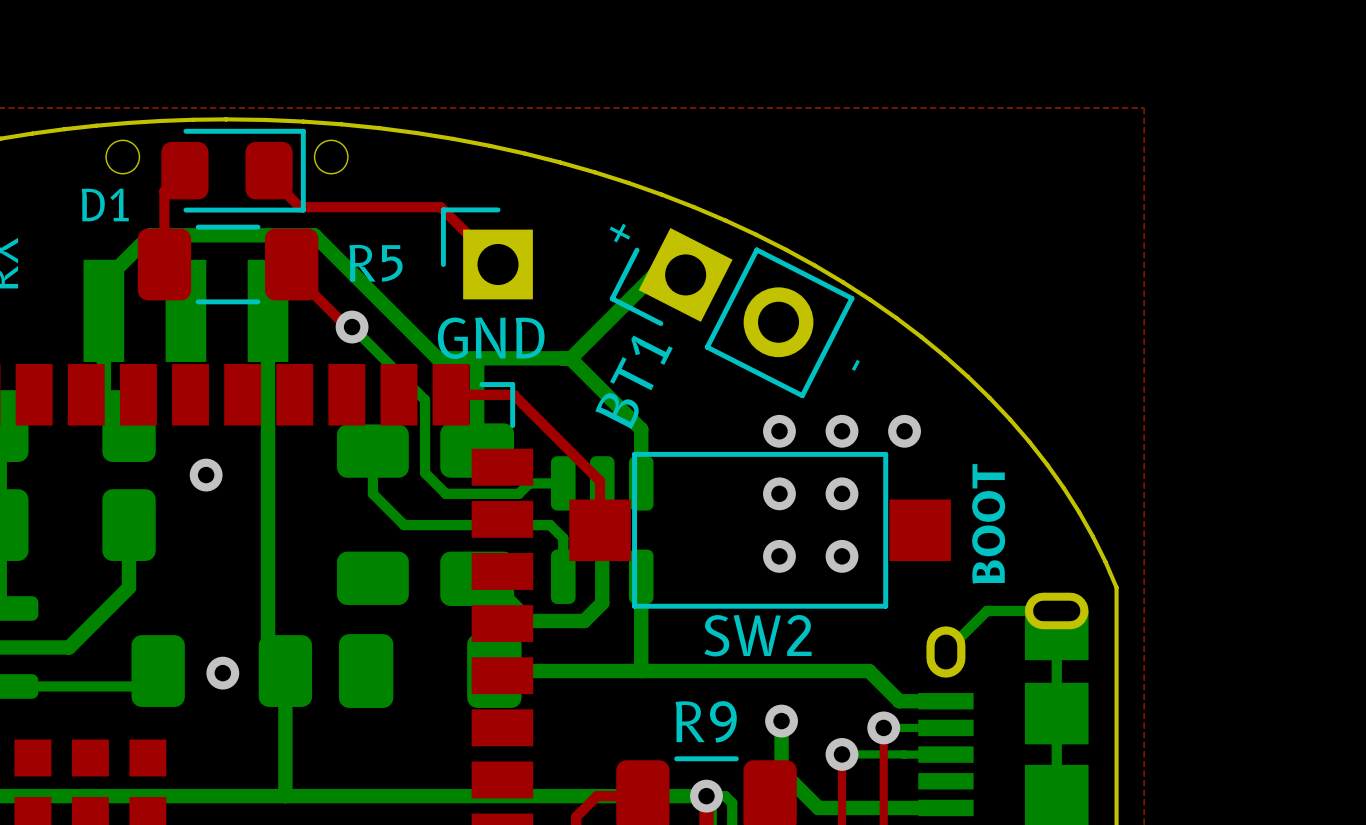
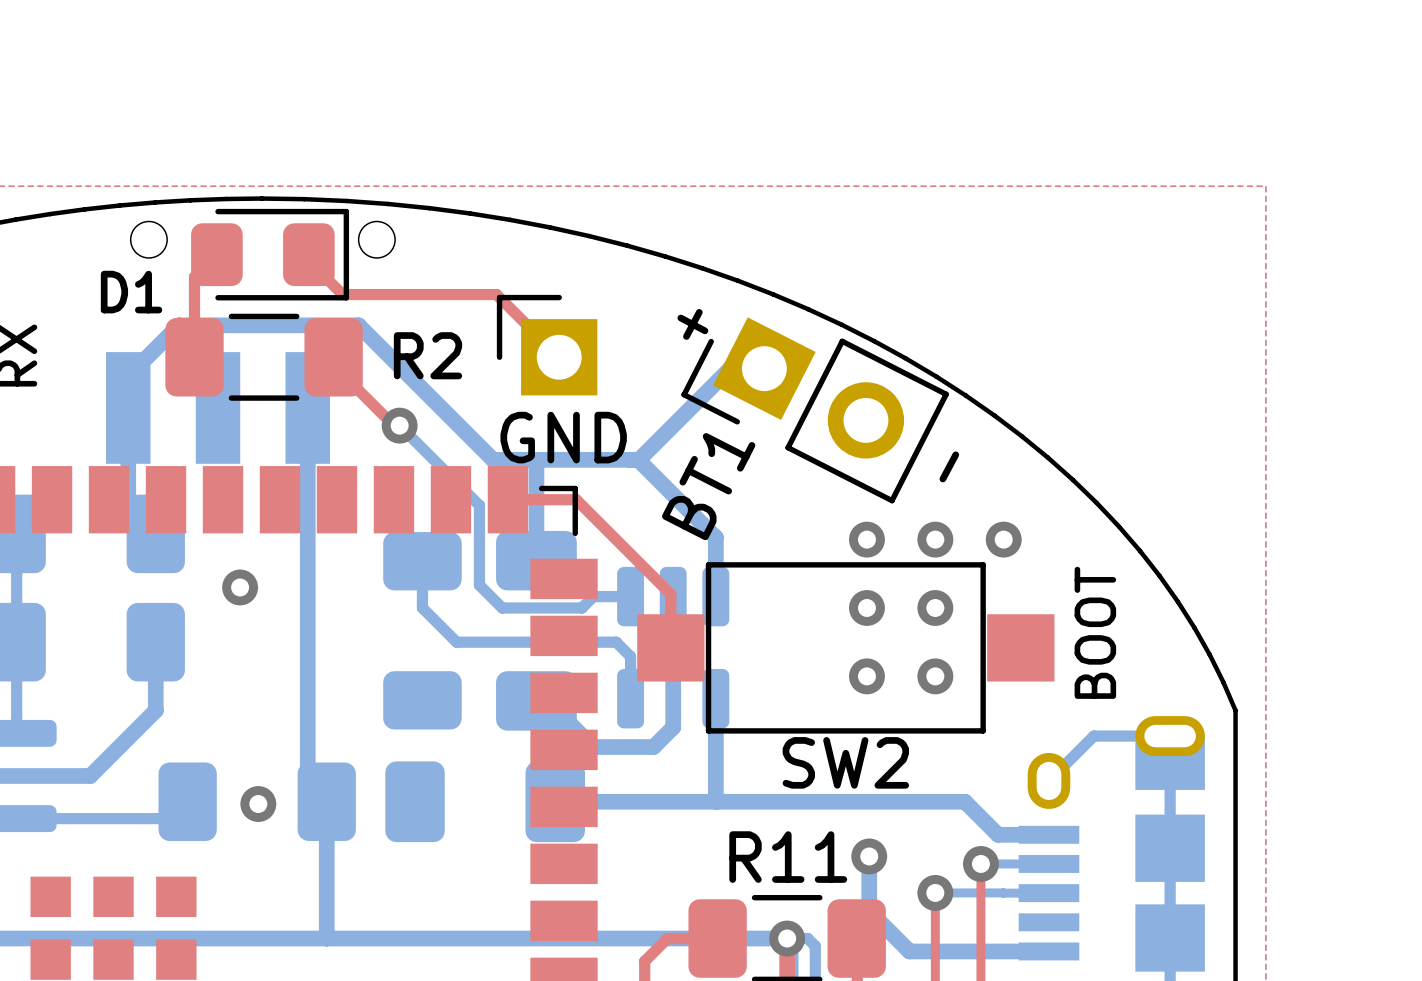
R5 name: R5 (375, 263) -> R2 (427, 355)
R9 name: R9 (706, 721) -> R11 (788, 857)

